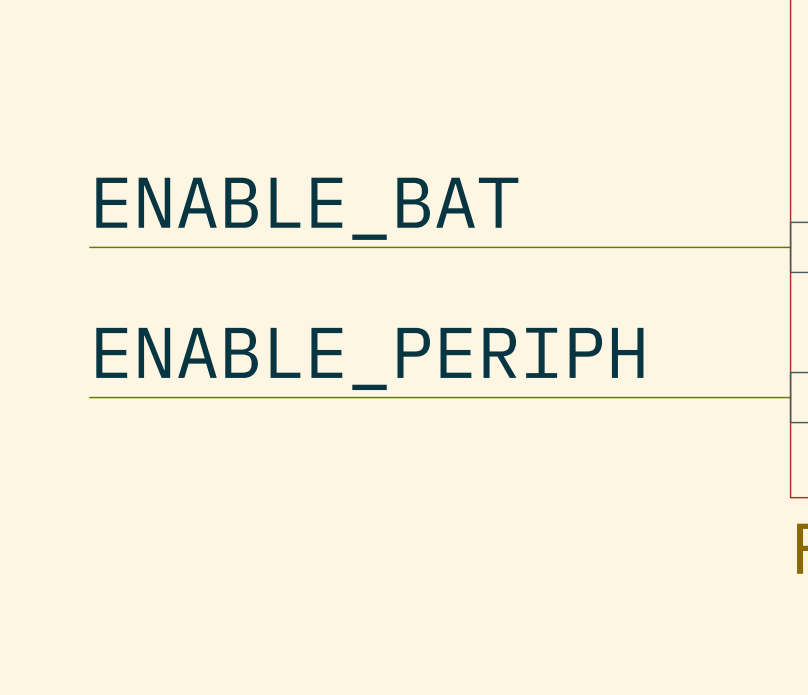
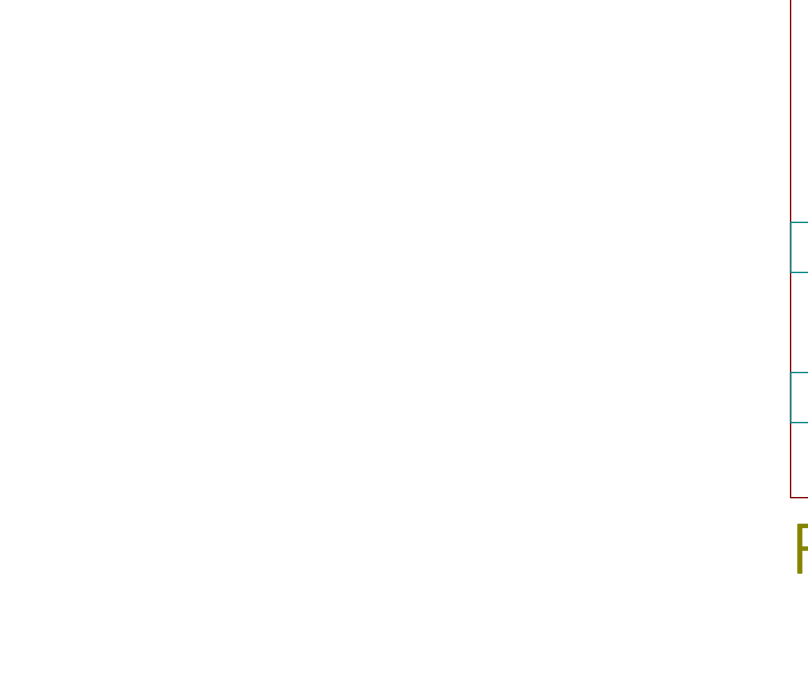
label: ENABLE_BAT (307, 208) -> none
wire: (89, 247) (790, 247) -> none
label: ENABLE_PERIPH (369, 358) -> none
wire: (89, 397) (790, 397) -> none

